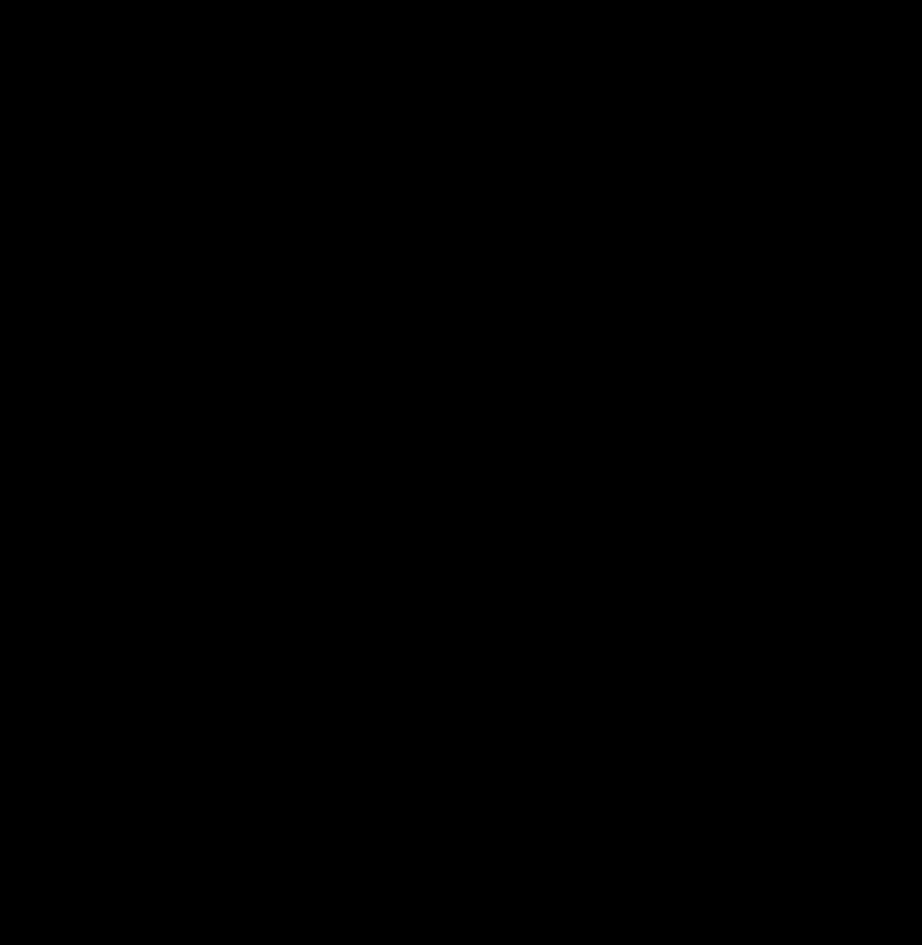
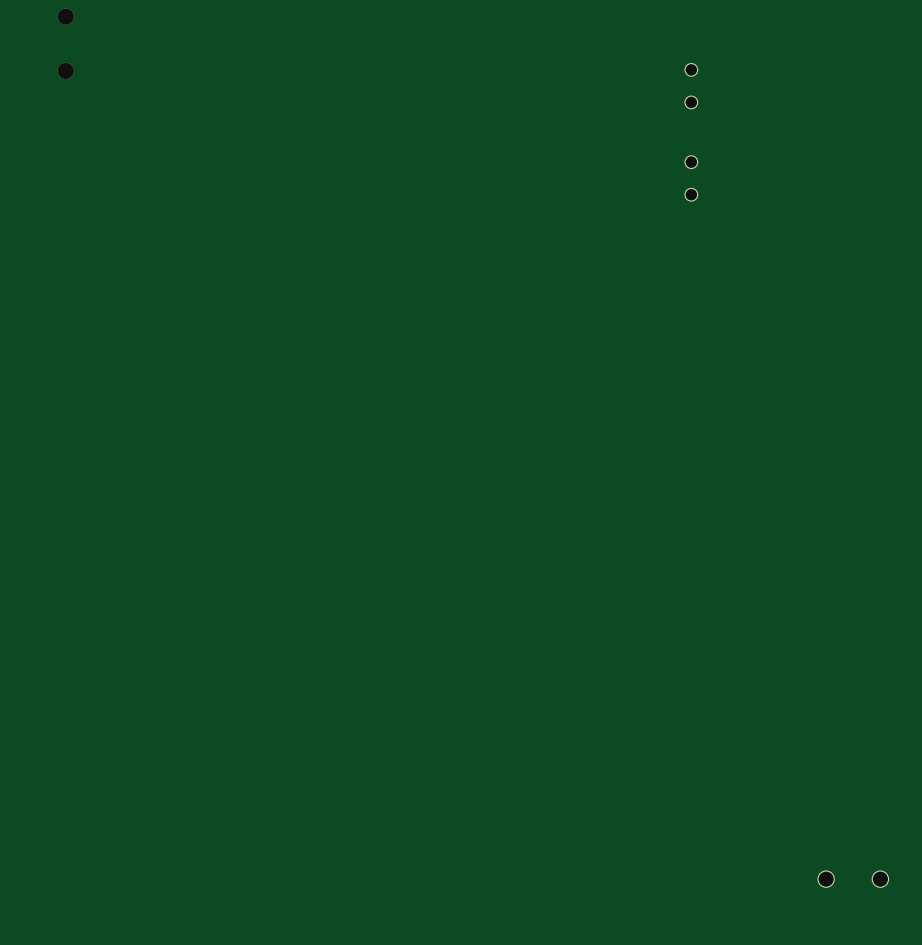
part: none -> (65, 43)
part: none -> (691, 86)
part: none -> (691, 178)
part: none -> (853, 879)

